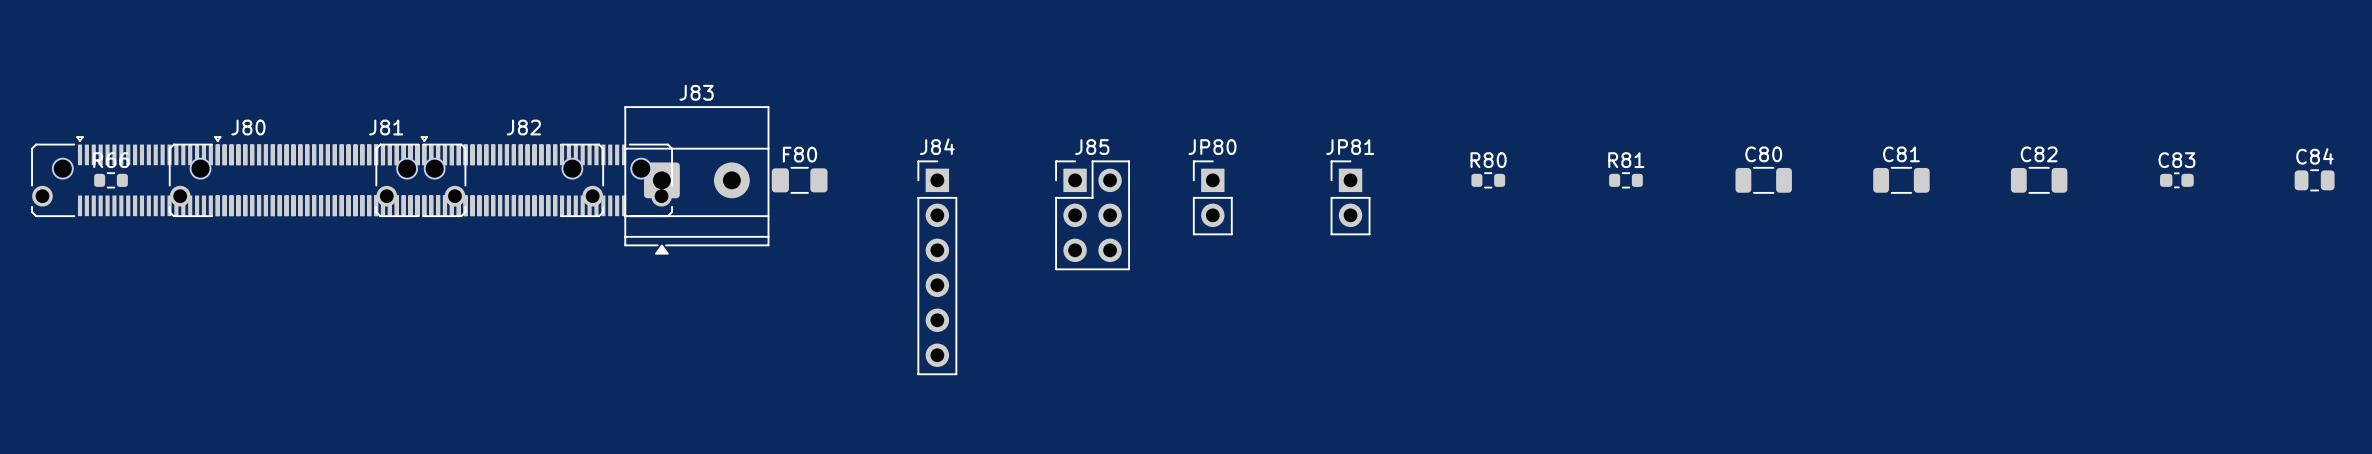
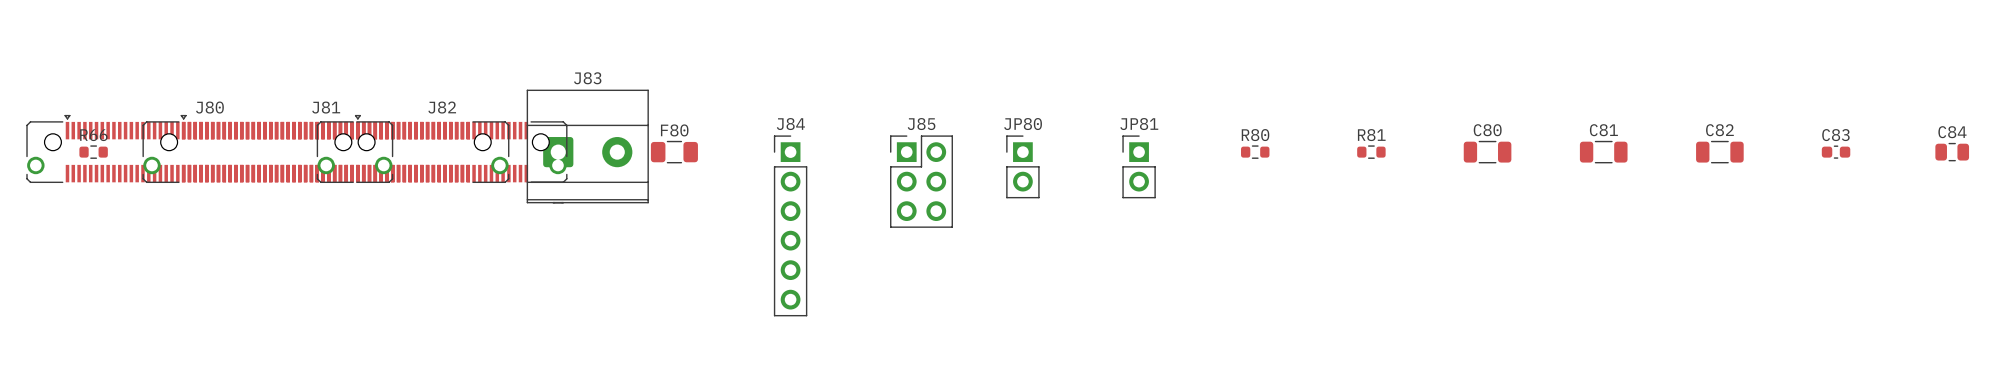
J83 footprint: [624, 106, 770, 255] -> [526, 89, 649, 204]

